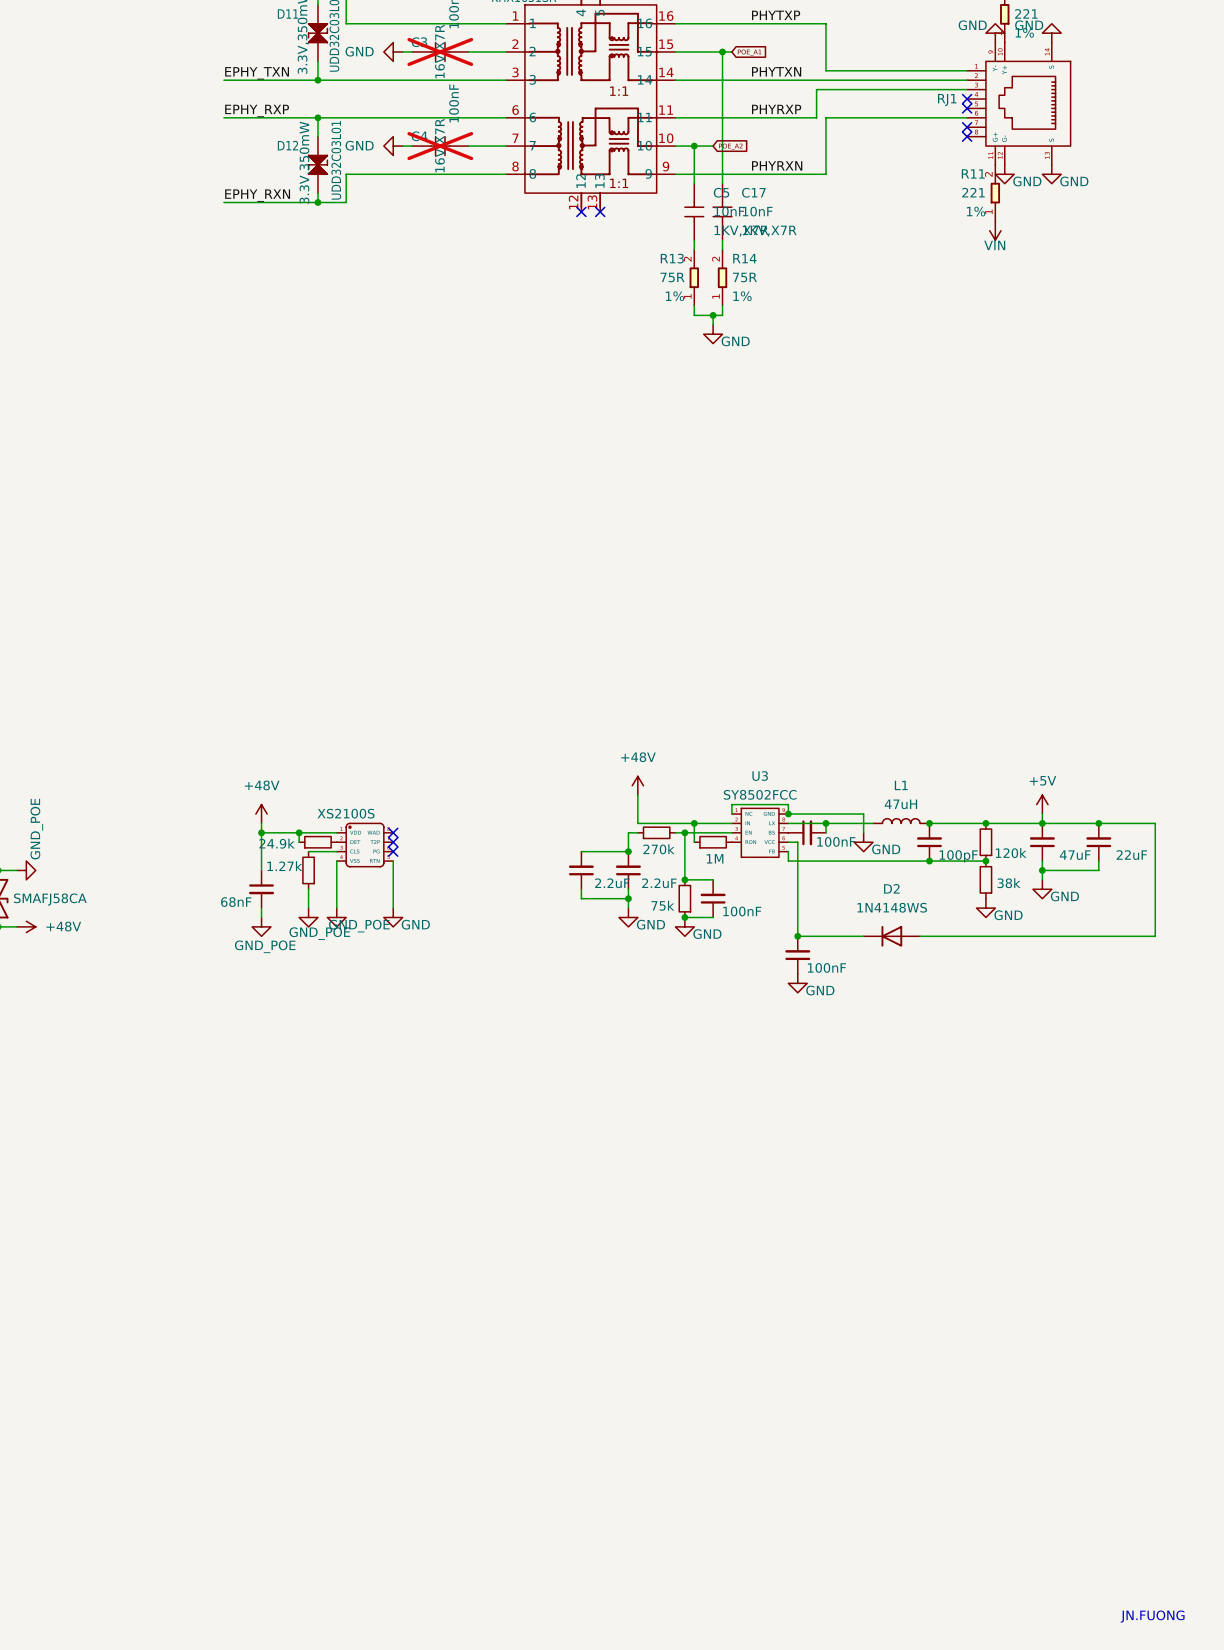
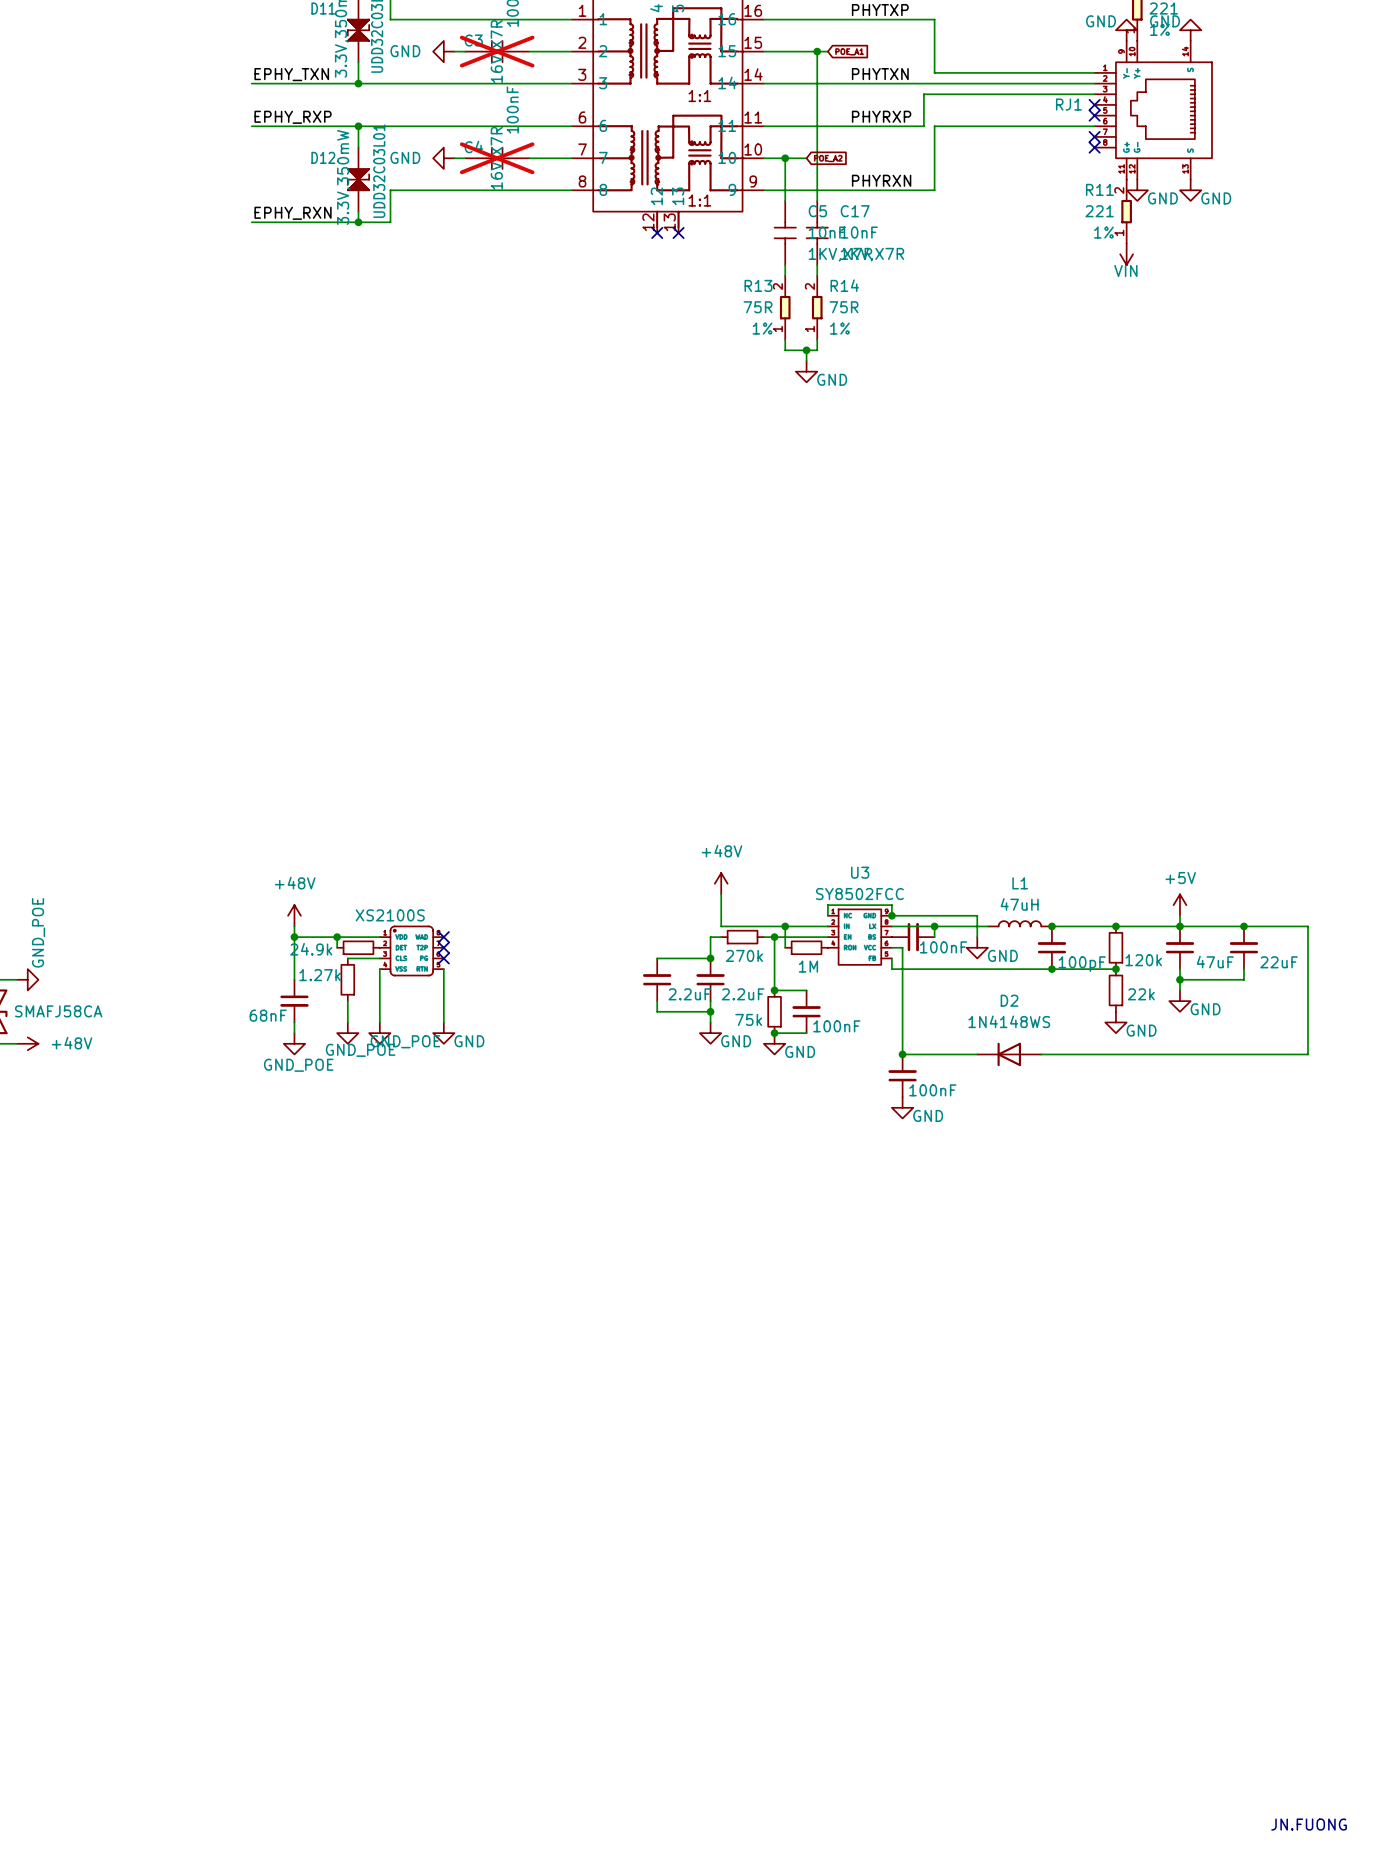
part value: 38k (1008, 883) -> 22k (1141, 994)

